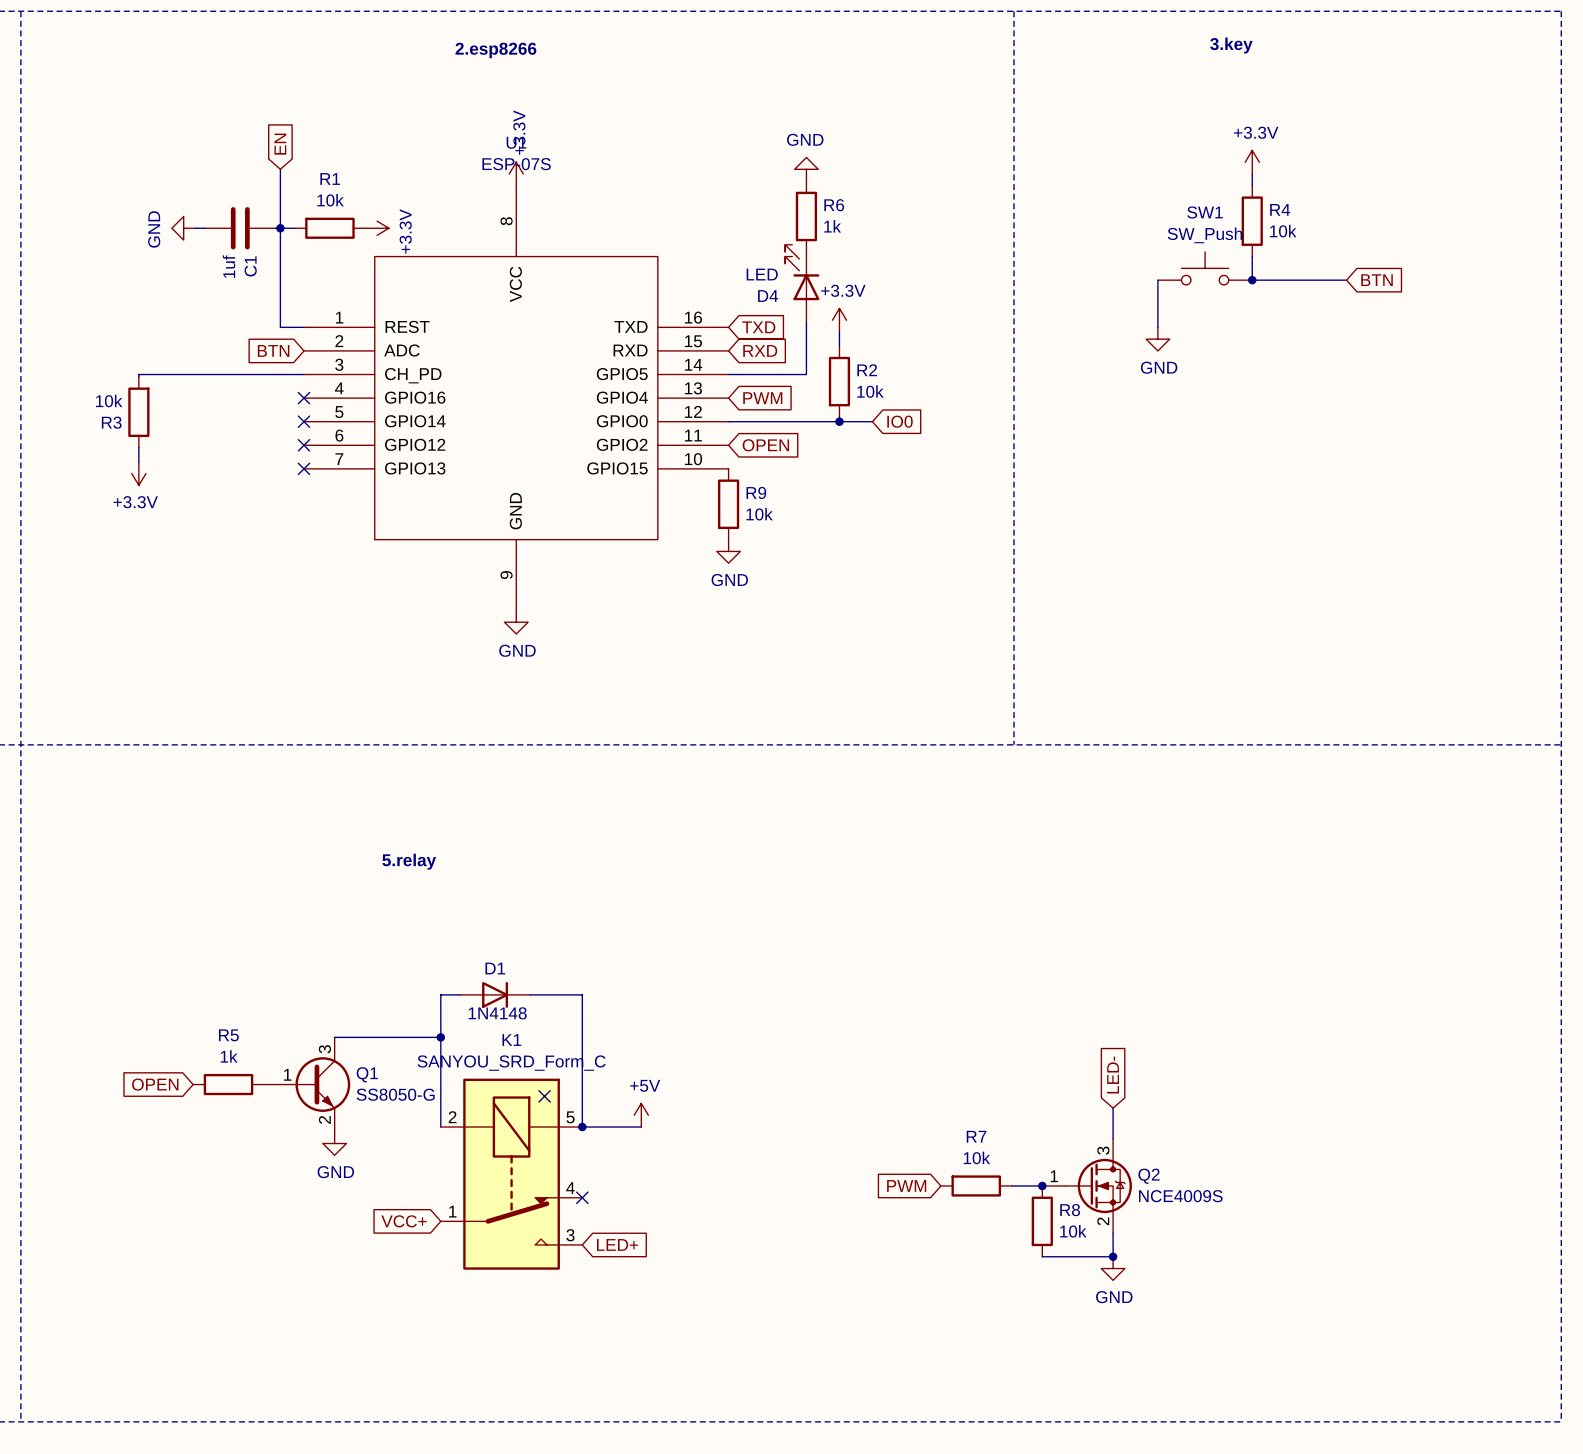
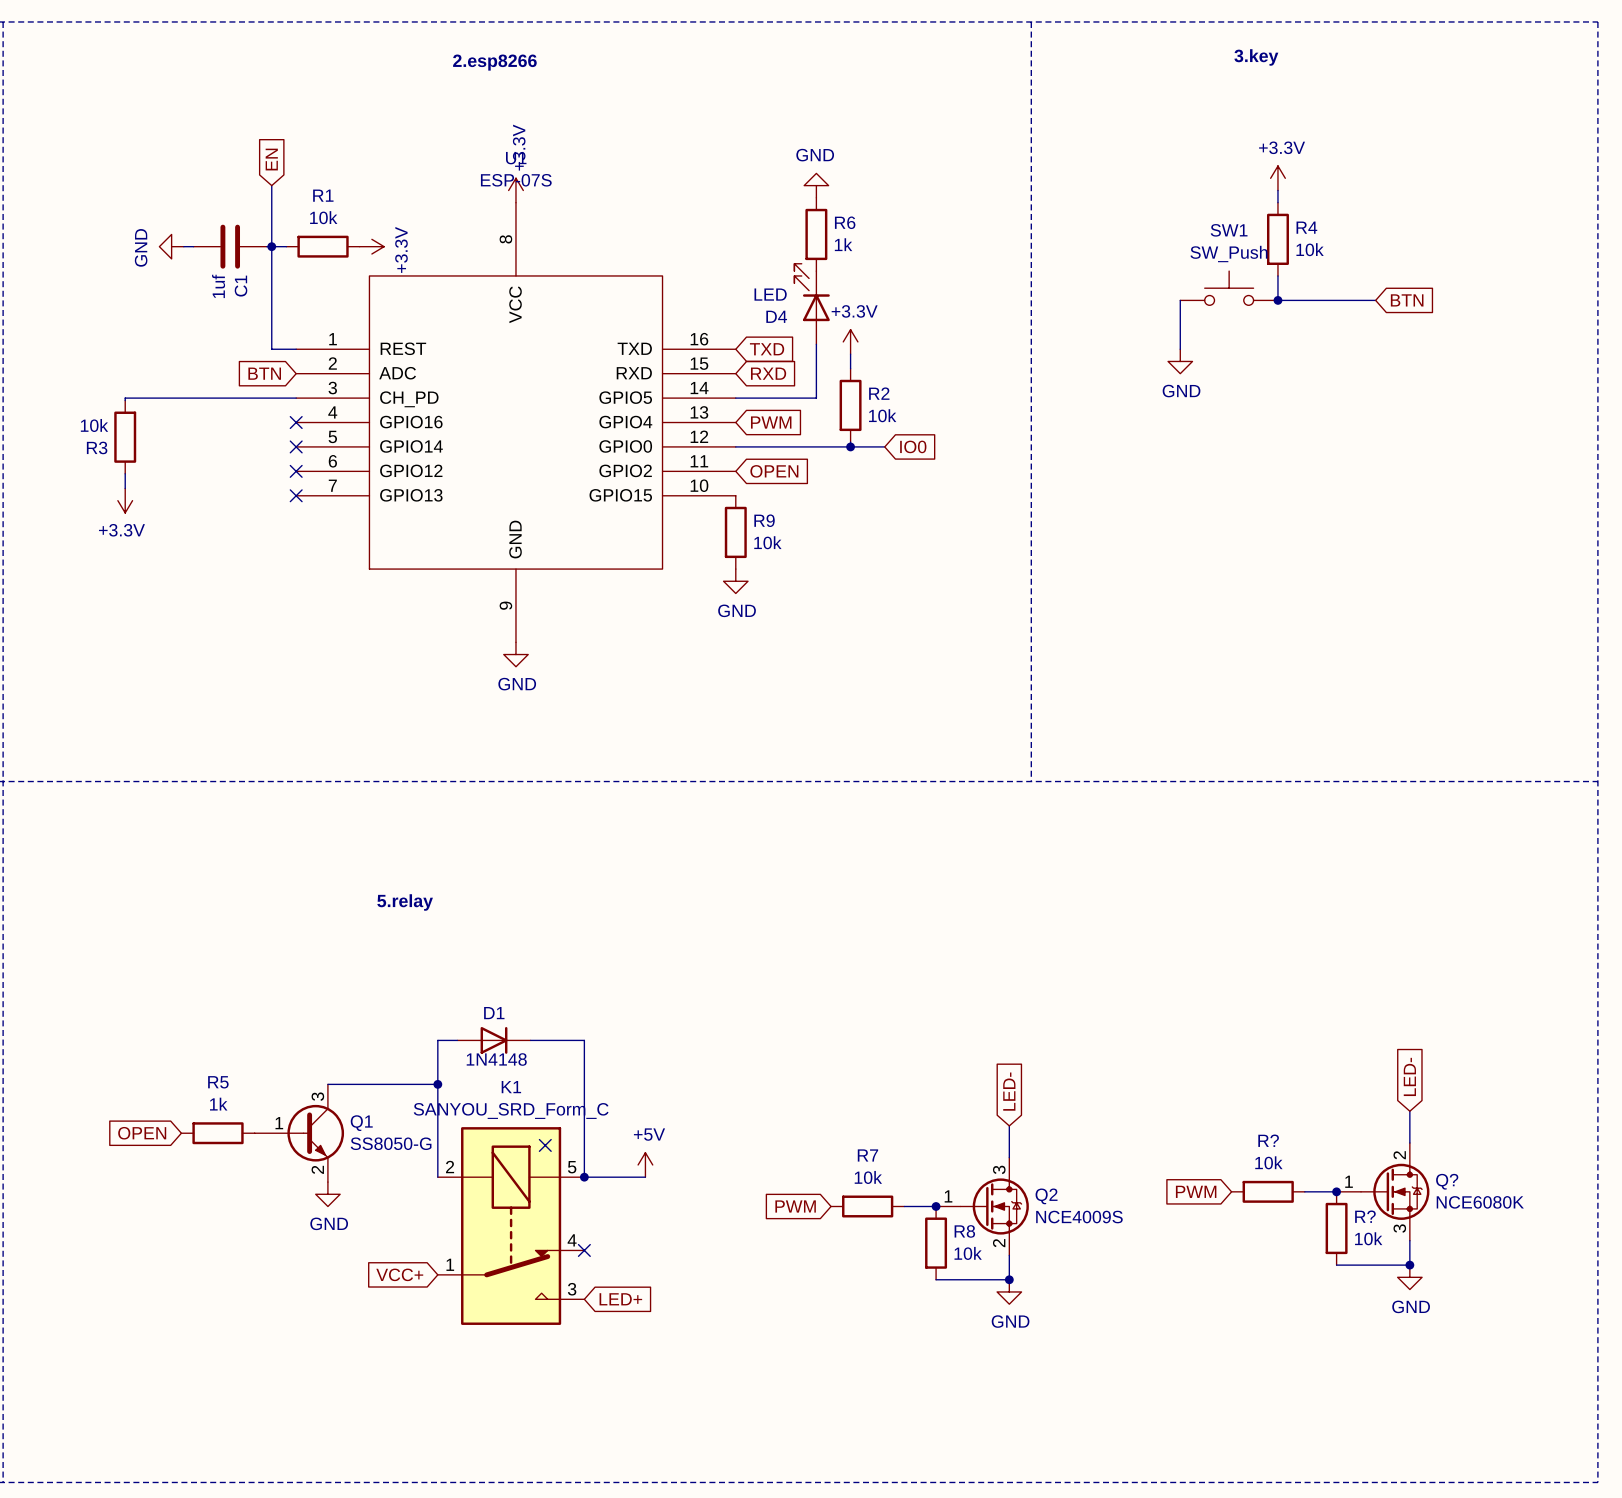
global label: none -> LED- (1409, 1076)
wire: none -> (1409, 1111) (1409, 1142)
global label position: LED- (1113, 1075) -> LED- (1009, 1091)
wire: (1113, 1108) (1113, 1138) -> (1009, 1125) (1009, 1157)
global label: none -> PWM (1196, 1191)
R?: none -> 10k (1268, 1191)
wire: none -> (1304, 1191) (1336, 1191)
junction: none -> (1336, 1191)
Q?: none -> NCE6080K (1383, 1191)
junction: none -> (936, 1206)
R?: none -> 10k (1336, 1228)
global label position: PWM (906, 1185) -> PWM (795, 1206)
R7 position: (976, 1185) -> (867, 1206)
wire: (1011, 1185) (1042, 1185) -> (904, 1206) (936, 1206)
junction: (1042, 1185) -> none
Q2 position: (1087, 1185) -> (982, 1206)
wire: none -> (1409, 1240) (1409, 1265) (1336, 1265)
junction: none -> (1409, 1265)
R8 position: (1042, 1221) -> (936, 1243)
power symbol: none -> GND (1409, 1277)
junction: none -> (1009, 1279)
wire: (1113, 1233) (1113, 1256) (1042, 1256) -> (1009, 1255) (1009, 1279) (936, 1279)
junction: (1113, 1256) -> none
power symbol position: GND (1113, 1268) -> GND (1009, 1291)

